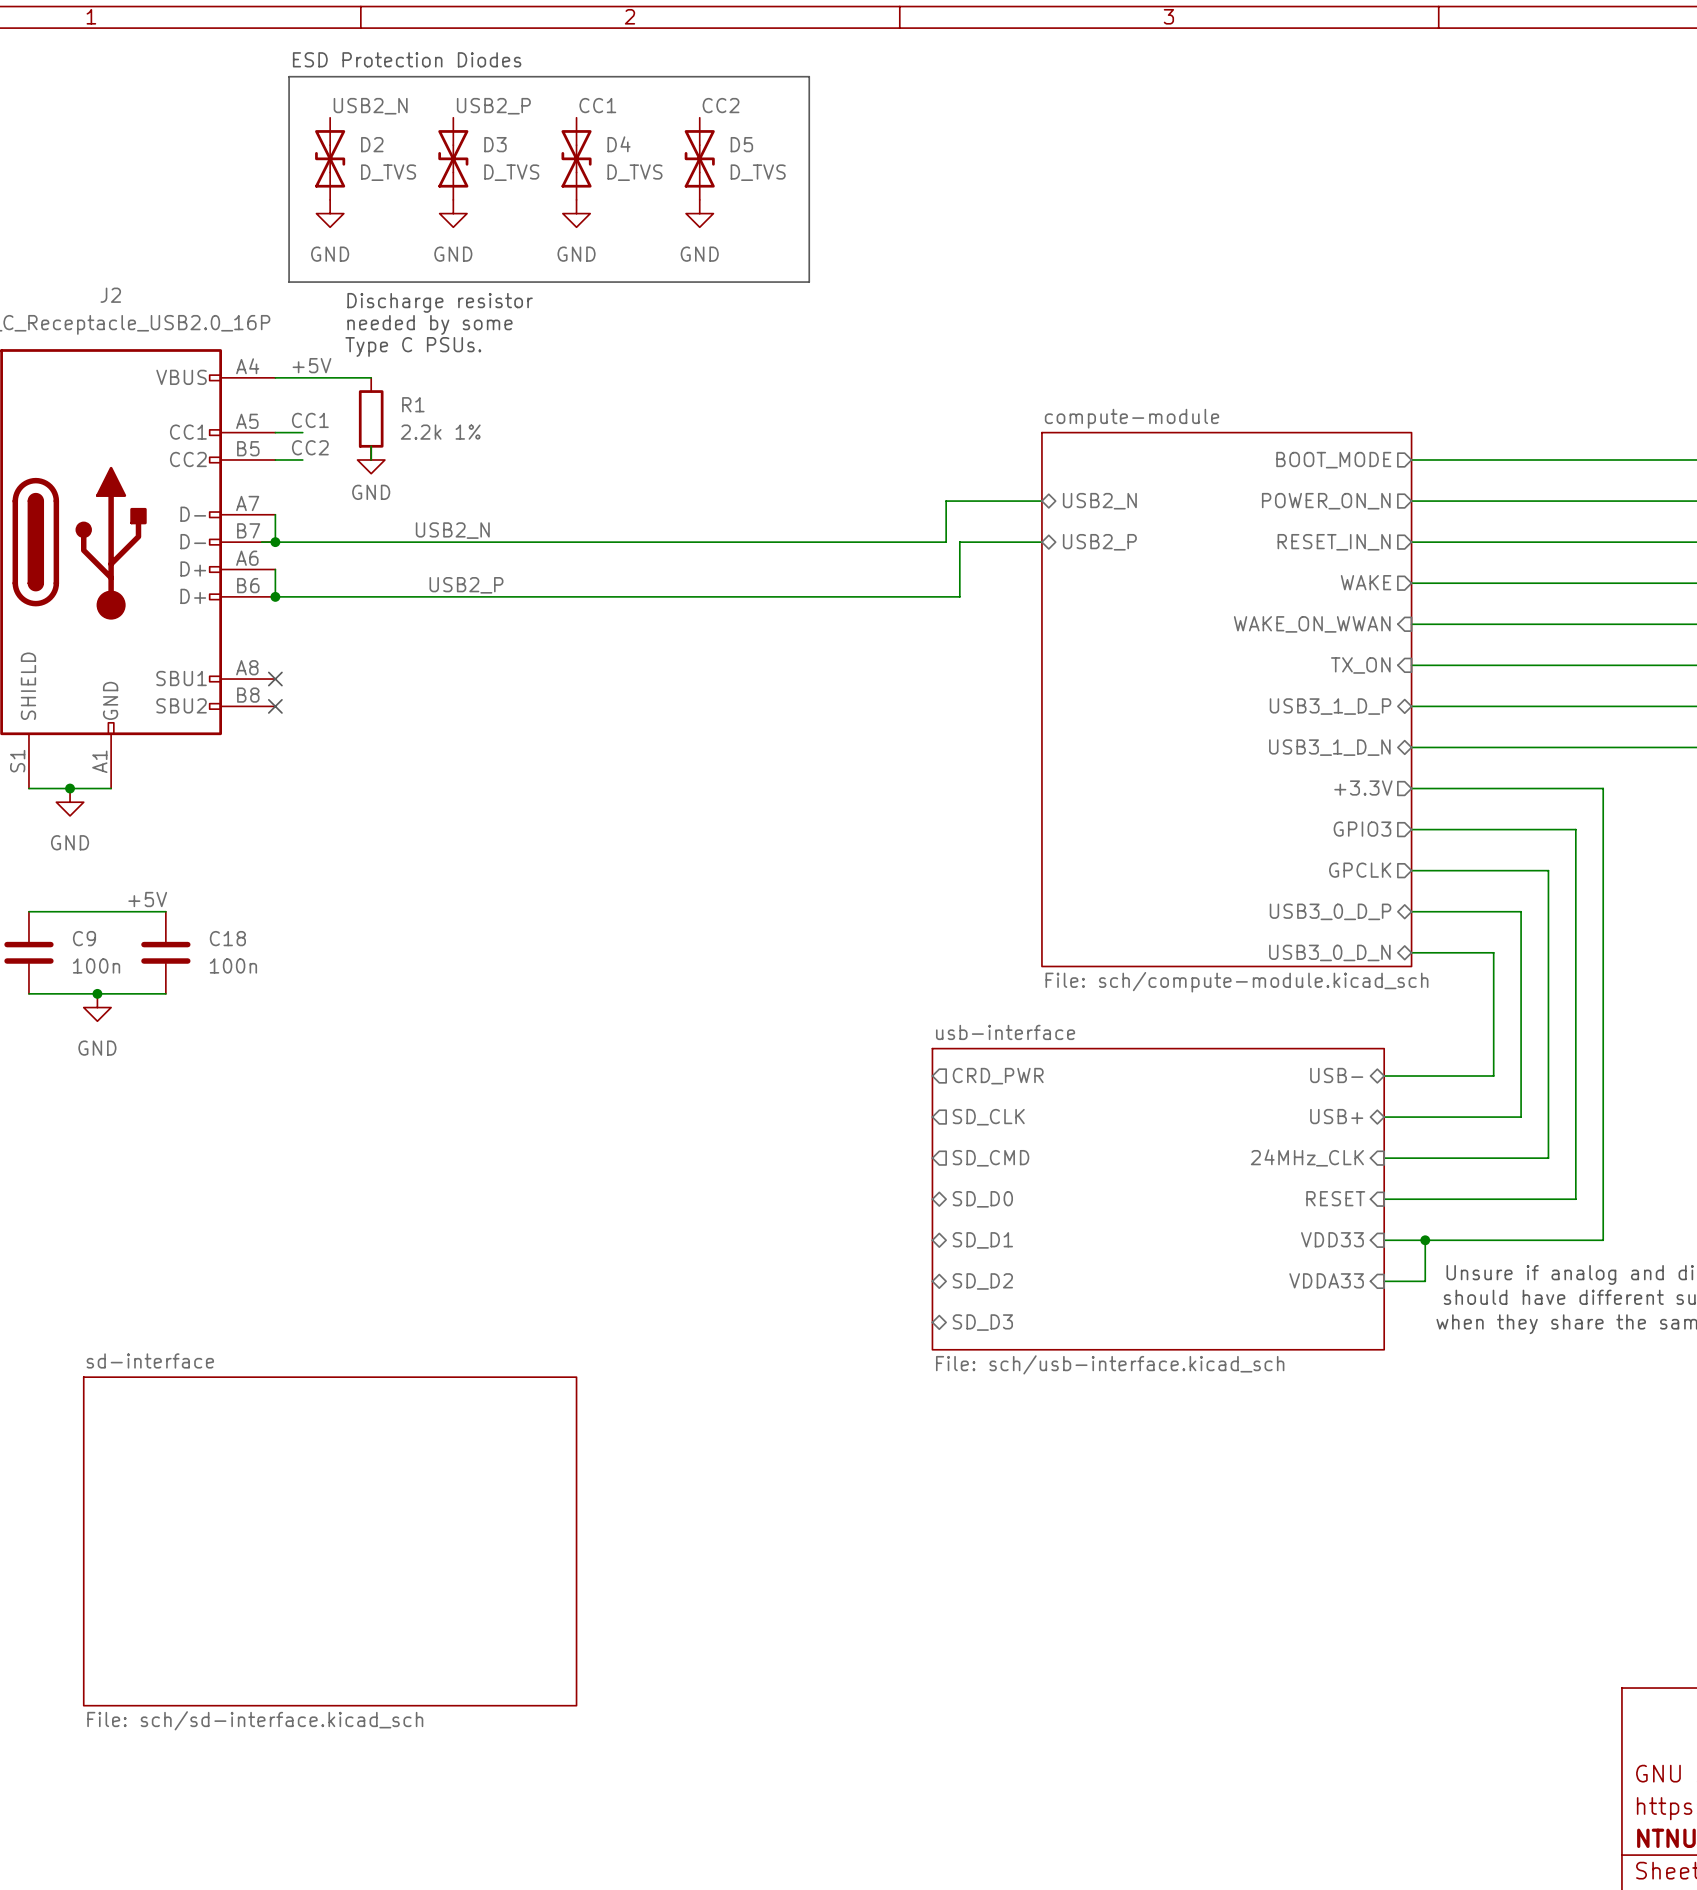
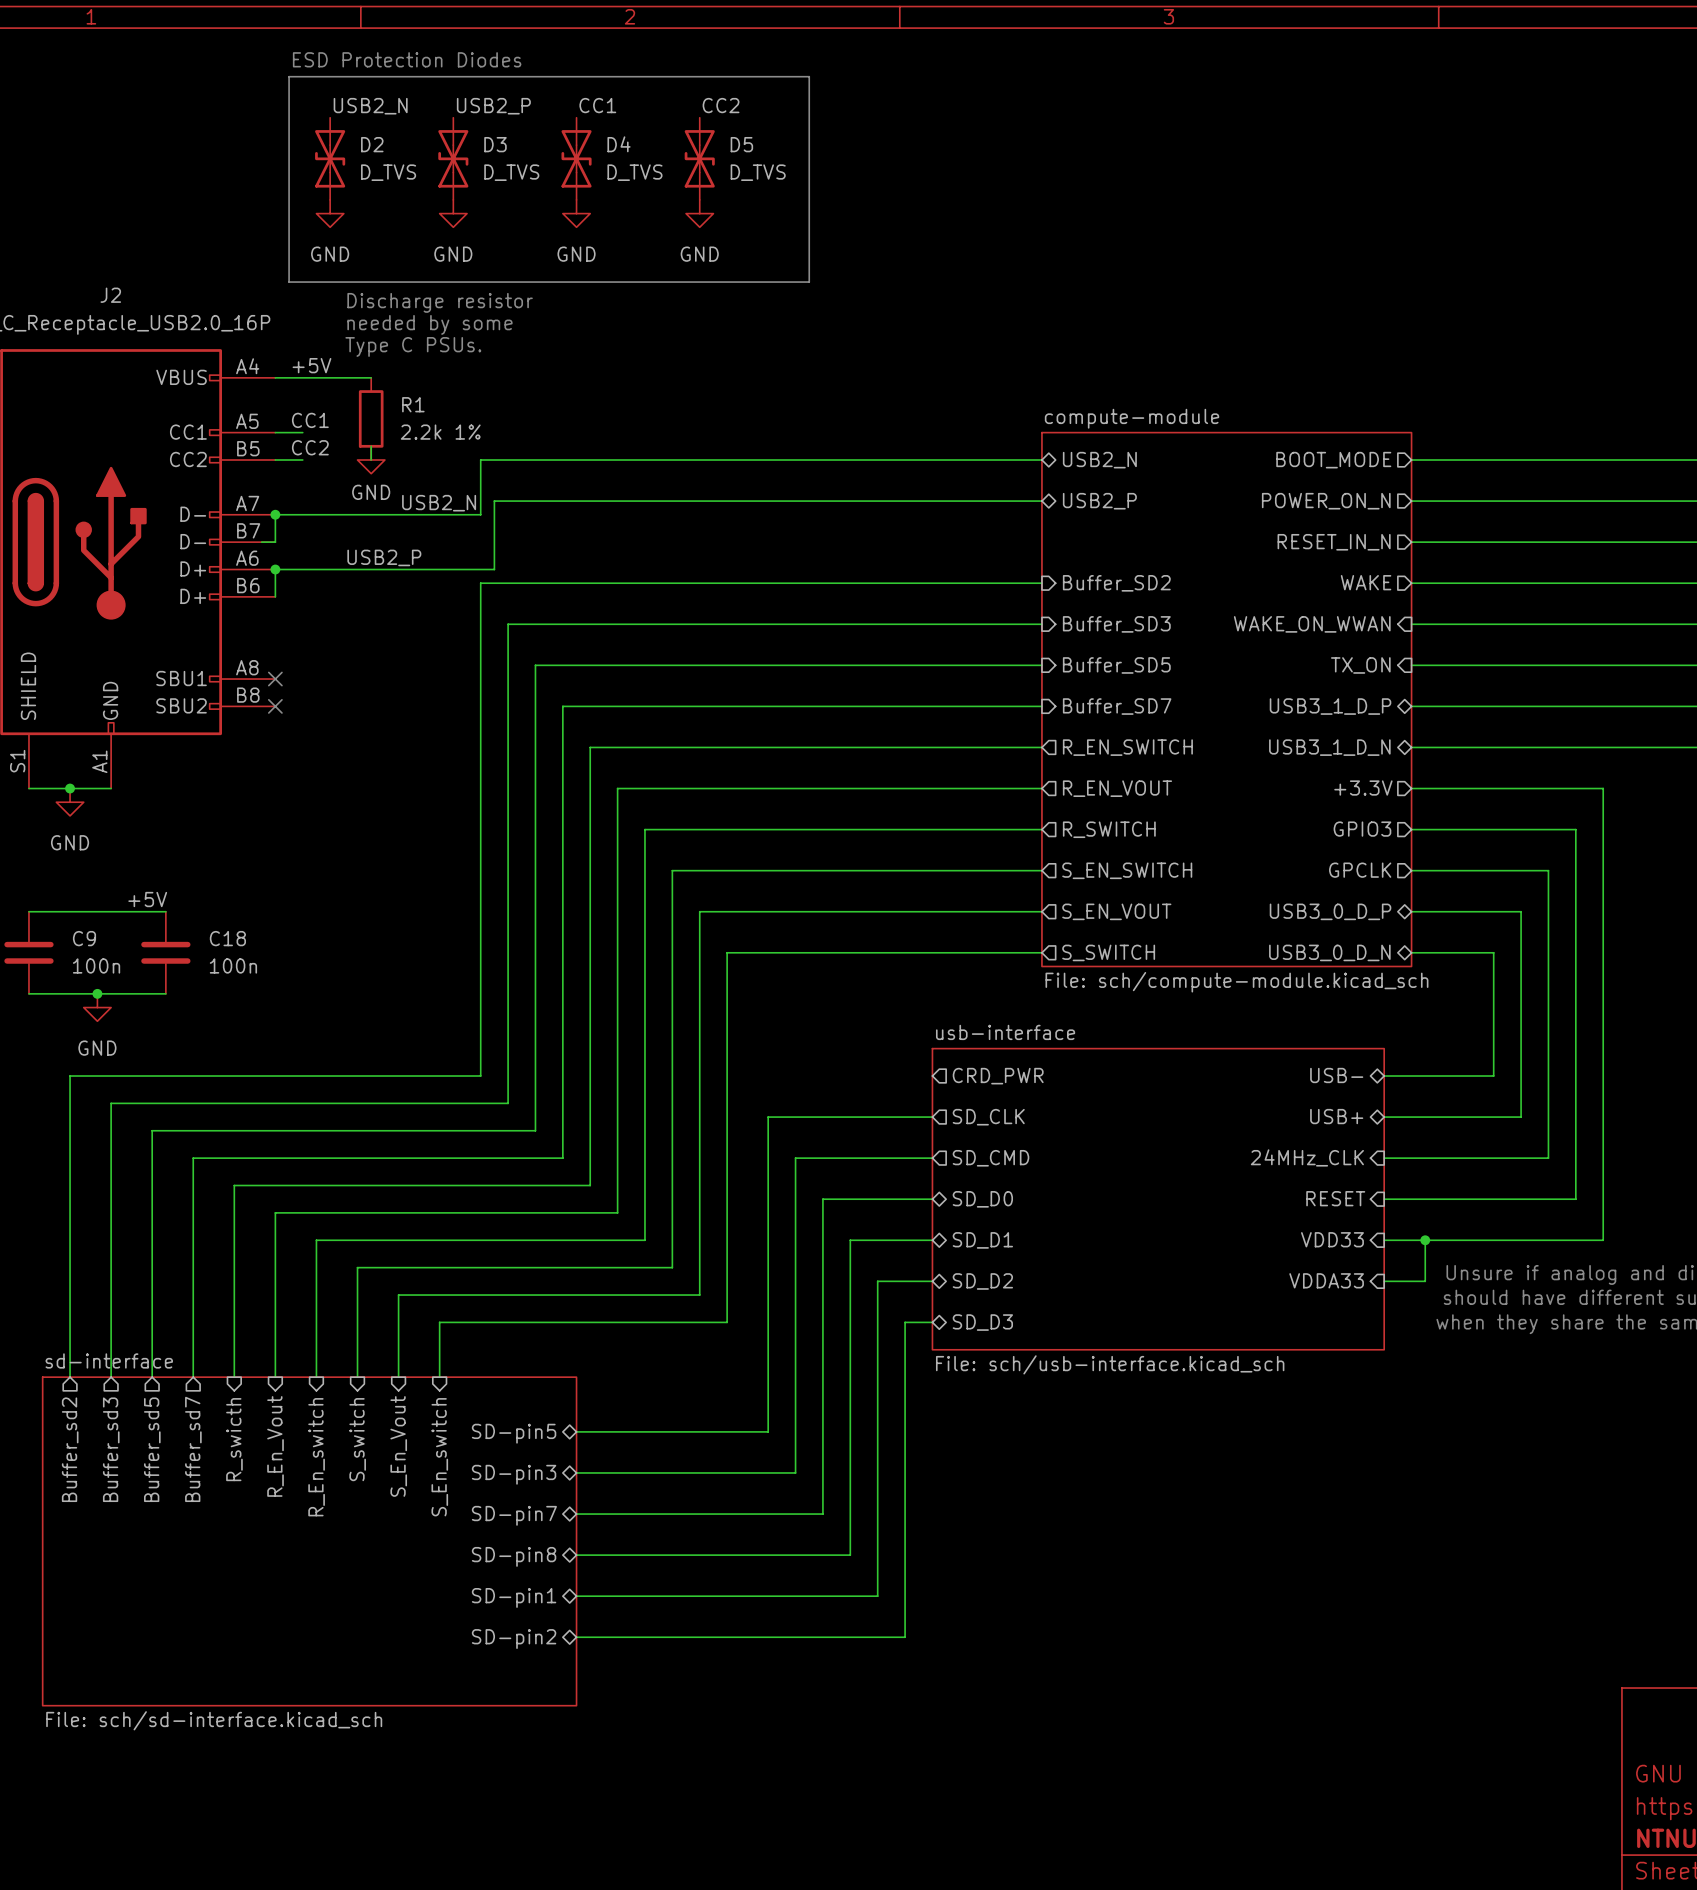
wire: none -> (1041, 460) (480, 460) (480, 514) (275, 514)
sheet pin: none -> USB2_N (1099, 460)
wire: (946, 501) (946, 542) (275, 542) -> (946, 501) (494, 501) (494, 569) (275, 569)
sheet pin: USB2_N (1099, 501) -> USB2_P (1099, 501)
junction: none -> (275, 514)
label position: USB2_N (452, 530) -> USB2_N (439, 503)
junction: (275, 542) -> none
wire: (1041, 542) (959, 542) (959, 596) (275, 596) -> none
sheet pin: USB2_P (1099, 542) -> none
junction: none -> (275, 569)
wire: none -> (1041, 583) (480, 583) (480, 1076) (70, 1076) (70, 1377)
sheet pin: none -> Buffer_SD2 (1116, 583)
label position: USB2_P (466, 585) -> USB2_P (384, 557)
junction: (275, 596) -> none
wire: none -> (1041, 624) (508, 624) (508, 1103) (111, 1103) (111, 1377)
sheet pin: none -> Buffer_SD3 (1116, 624)
wire: none -> (1041, 665) (535, 665) (535, 1130) (152, 1130) (152, 1377)
sheet pin: none -> Buffer_SD5 (1116, 665)
wire: none -> (1041, 706) (562, 706) (562, 1158) (193, 1158) (193, 1377)
sheet pin: none -> Buffer_SD7 (1117, 706)
wire: none -> (1041, 747) (590, 747) (590, 1185) (234, 1185) (234, 1377)
sheet pin: none -> R_EN_SWITCH (1127, 747)
wire: none -> (1041, 788) (617, 788) (617, 1212) (275, 1212) (275, 1377)
sheet pin: none -> R_EN_VOUT (1117, 788)
wire: none -> (1041, 829) (644, 829) (644, 1240) (316, 1240) (316, 1377)
sheet pin: none -> R_SWITCH (1109, 829)
wire: none -> (1041, 870) (672, 870) (672, 1267) (357, 1267) (357, 1377)
sheet pin: none -> S_EN_SWITCH (1127, 870)
wire: none -> (1041, 911) (699, 911) (699, 1295) (398, 1295) (398, 1377)
sheet pin: none -> S_EN_VOUT (1116, 911)
wire: none -> (1041, 952) (727, 952) (727, 1322) (439, 1322) (439, 1377)
sheet pin: none -> S_SWITCH (1108, 952)
wire: none -> (932, 1117) (768, 1117) (768, 1431) (576, 1431)
wire: none -> (932, 1158) (795, 1158) (795, 1472) (576, 1472)
wire: none -> (932, 1199) (822, 1199) (822, 1514) (576, 1514)
wire: none -> (932, 1240) (850, 1240) (850, 1555) (576, 1555)
wire: none -> (932, 1281) (877, 1281) (877, 1596) (576, 1596)
wire: none -> (932, 1322) (905, 1322) (905, 1637) (576, 1637)
sheet pin: none -> SD-pin5 (514, 1433)
sheet pin: none -> R_swicth (234, 1439)
sheet pin: none -> S_switch (357, 1439)
sheet pin: none -> R_En_Vout (275, 1446)
sheet pin: none -> S_En_Vout (398, 1446)
sheet pin: none -> Buffer_sd2 (70, 1449)
sheet pin: none -> Buffer_sd3 (111, 1449)
sheet pin: none -> Buffer_sd5 (152, 1449)
sheet pin: none -> Buffer_sd7 (193, 1449)
sheet pin: none -> R_En_switch (316, 1457)
sheet pin: none -> S_En_switch (439, 1457)
sheet pin: none -> SD-pin3 (514, 1474)
sheet pin: none -> SD-pin7 (514, 1515)
sheet sd-interface: none -> File: sch/sd-interface.kicad_sch (309, 1541)
sheet sd-interface: File: sch/sd-interface.kicad_sch (330, 1541) -> none
sheet pin: none -> SD-pin8 (514, 1556)
sheet pin: none -> SD-pin1 (514, 1597)
sheet pin: none -> SD-pin2 (514, 1639)

